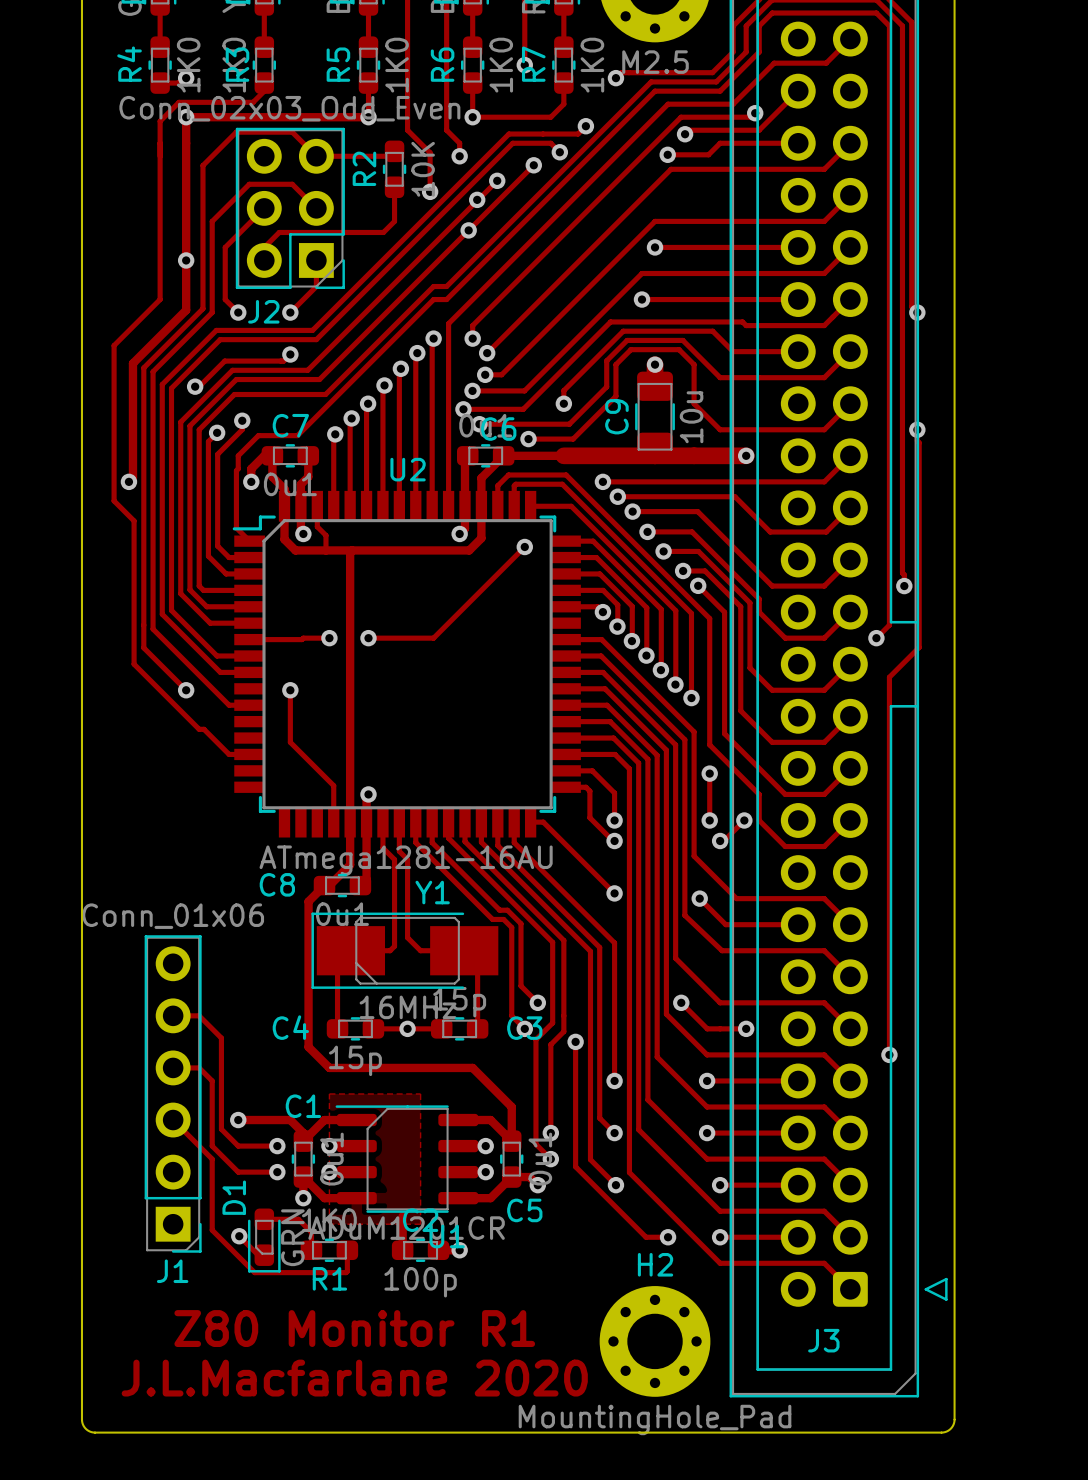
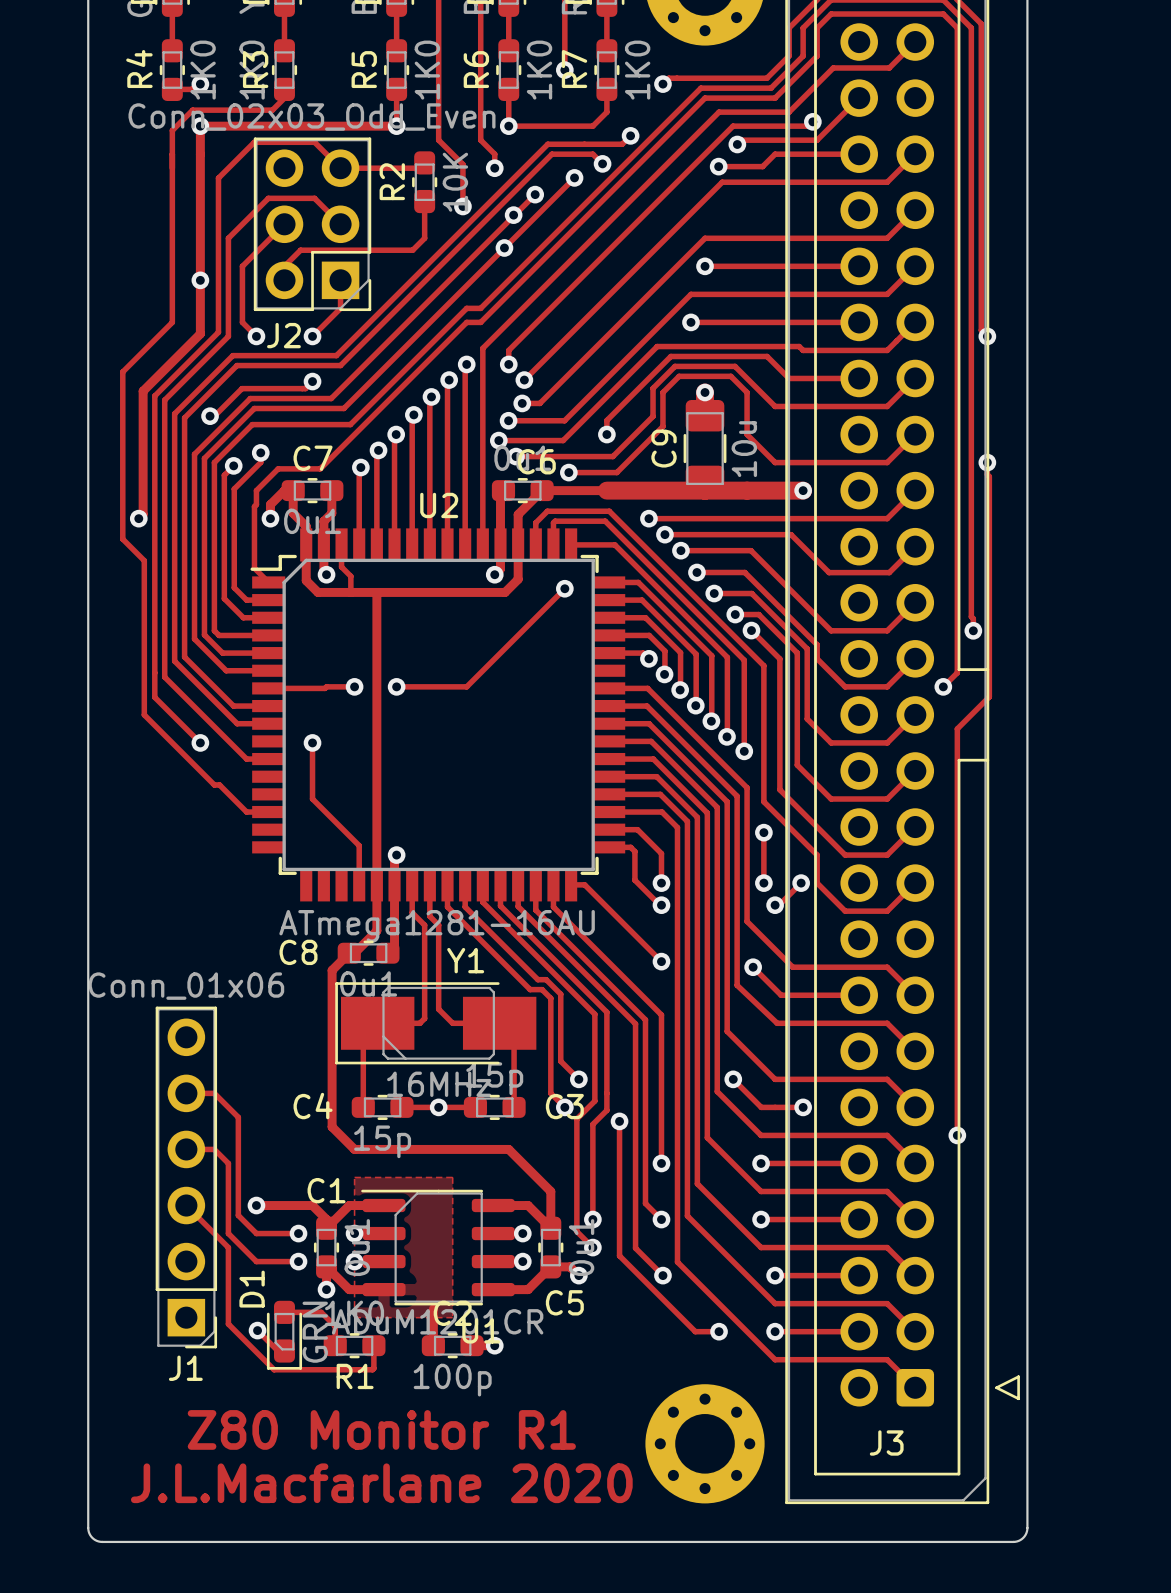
part value: M2.5 (655, 62) -> none
H2 name: H2 (655, 1264) -> none
H2 value: MountingHole_Pad (655, 1419) -> none

